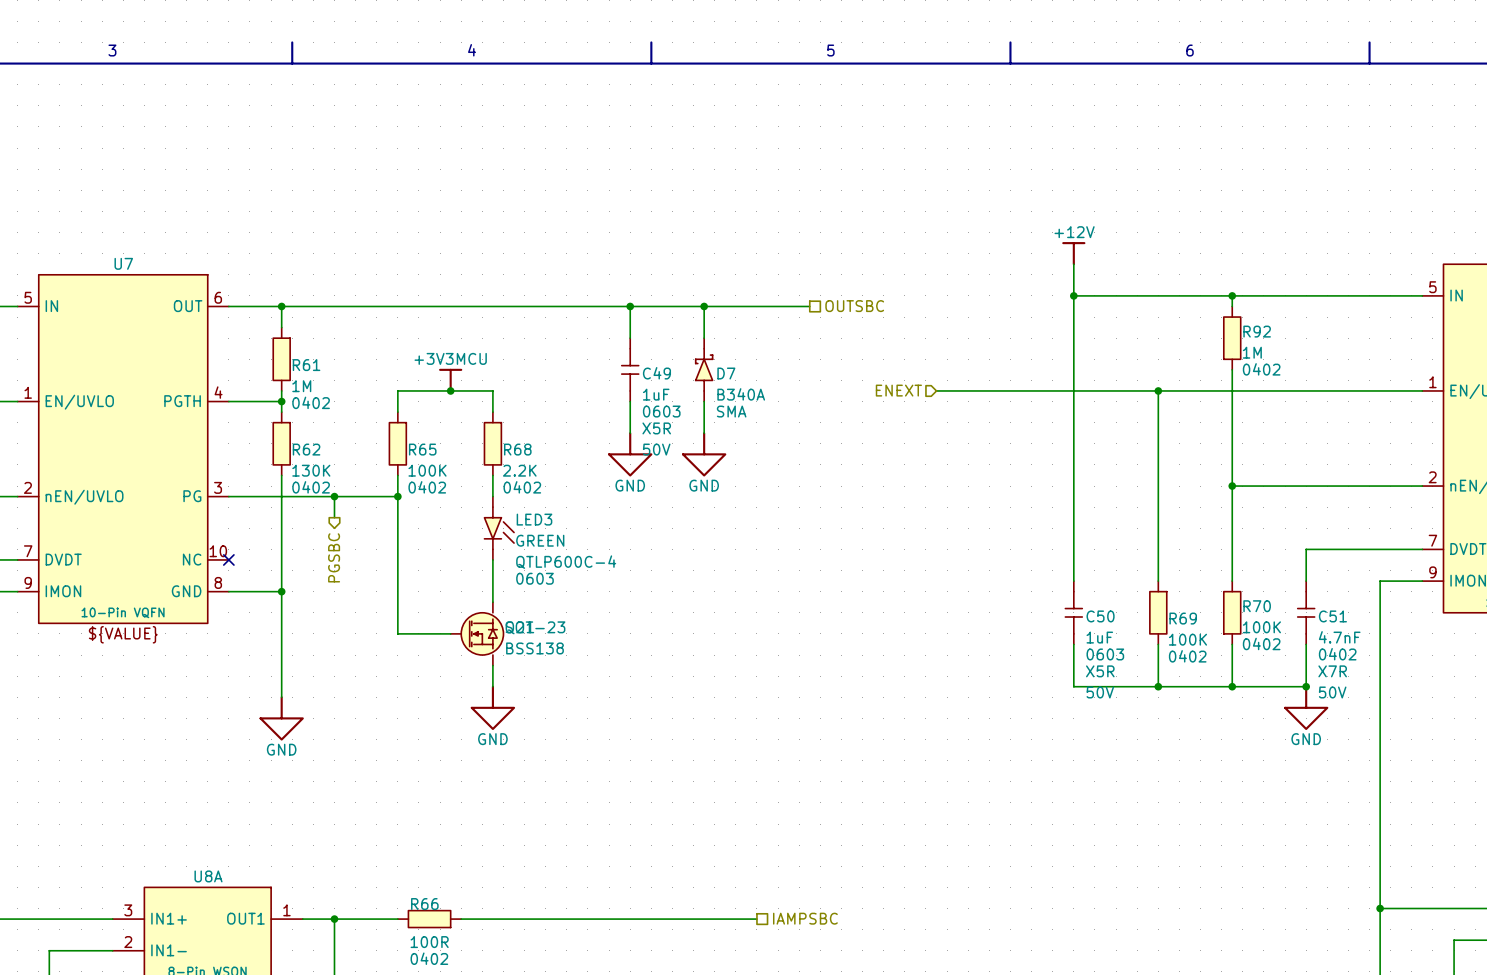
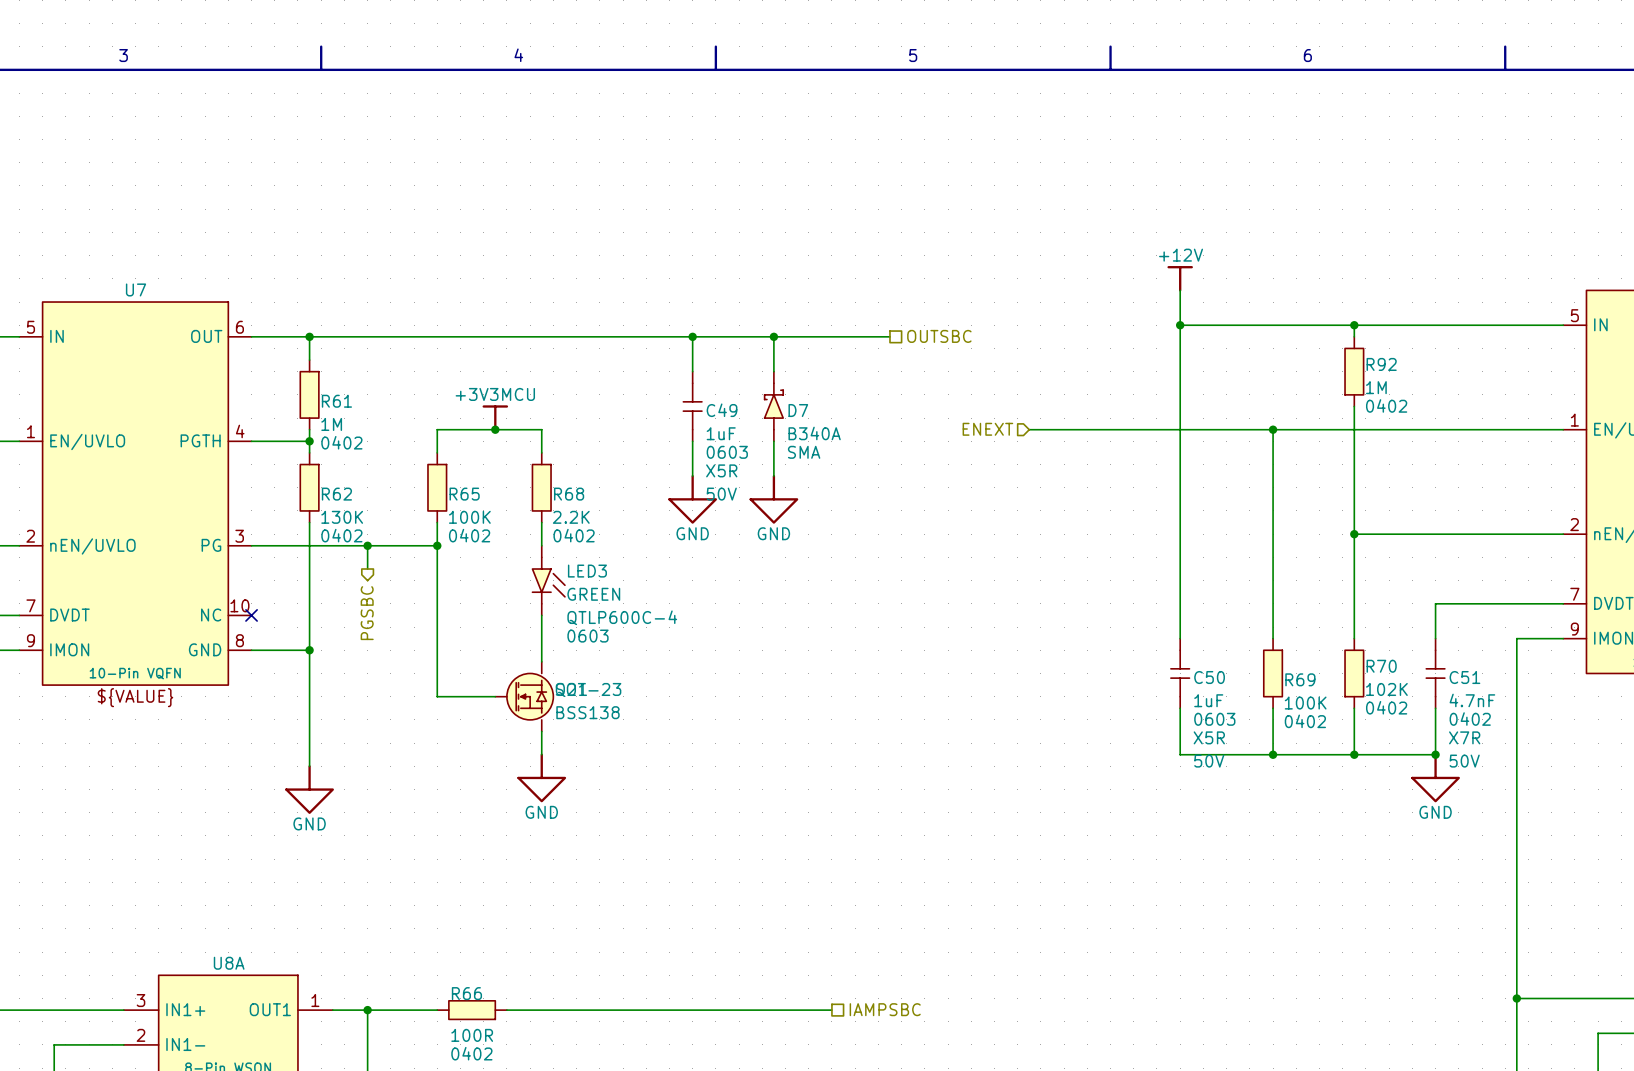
R70 text: 100K (1261, 627) -> 102K (1386, 689)

